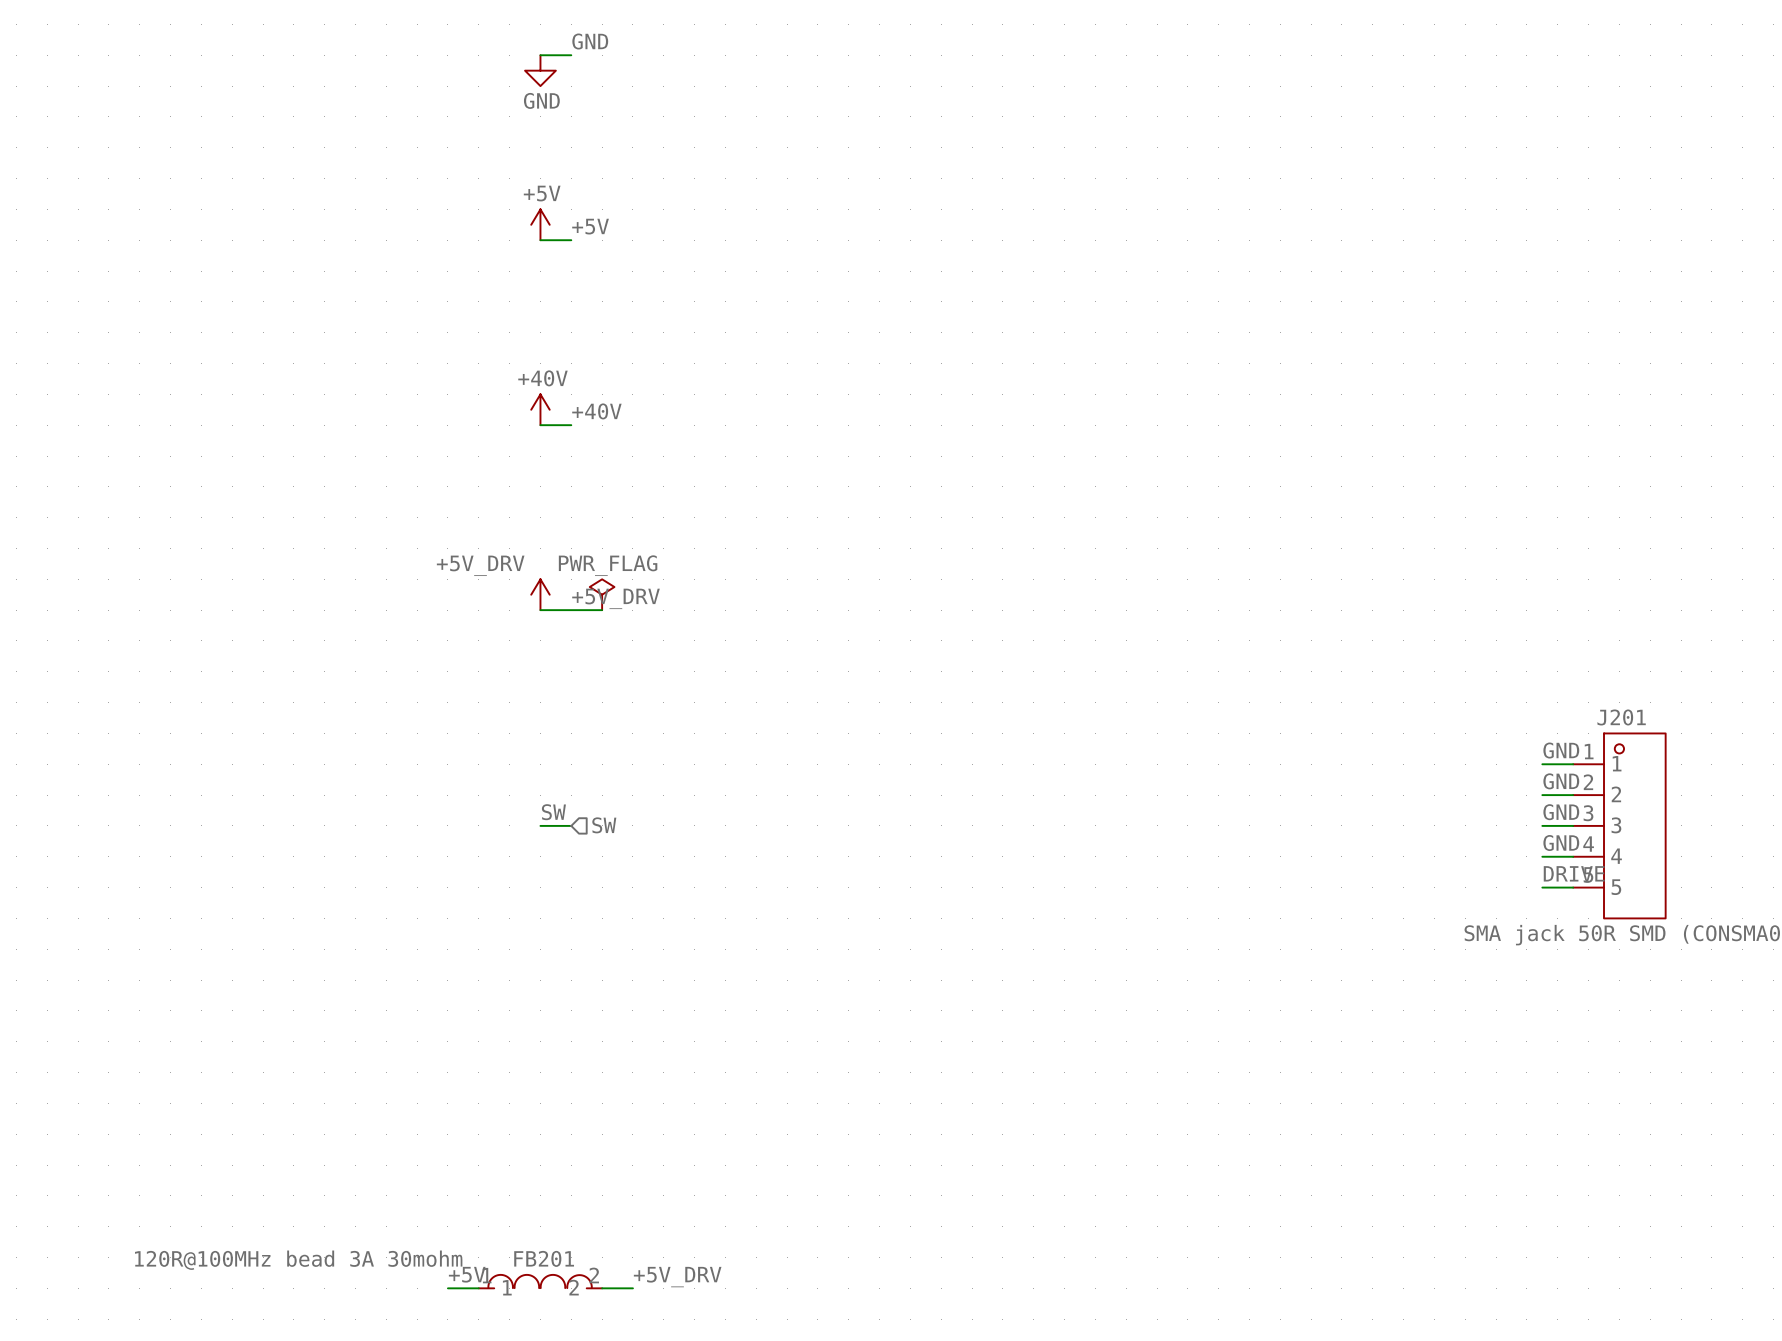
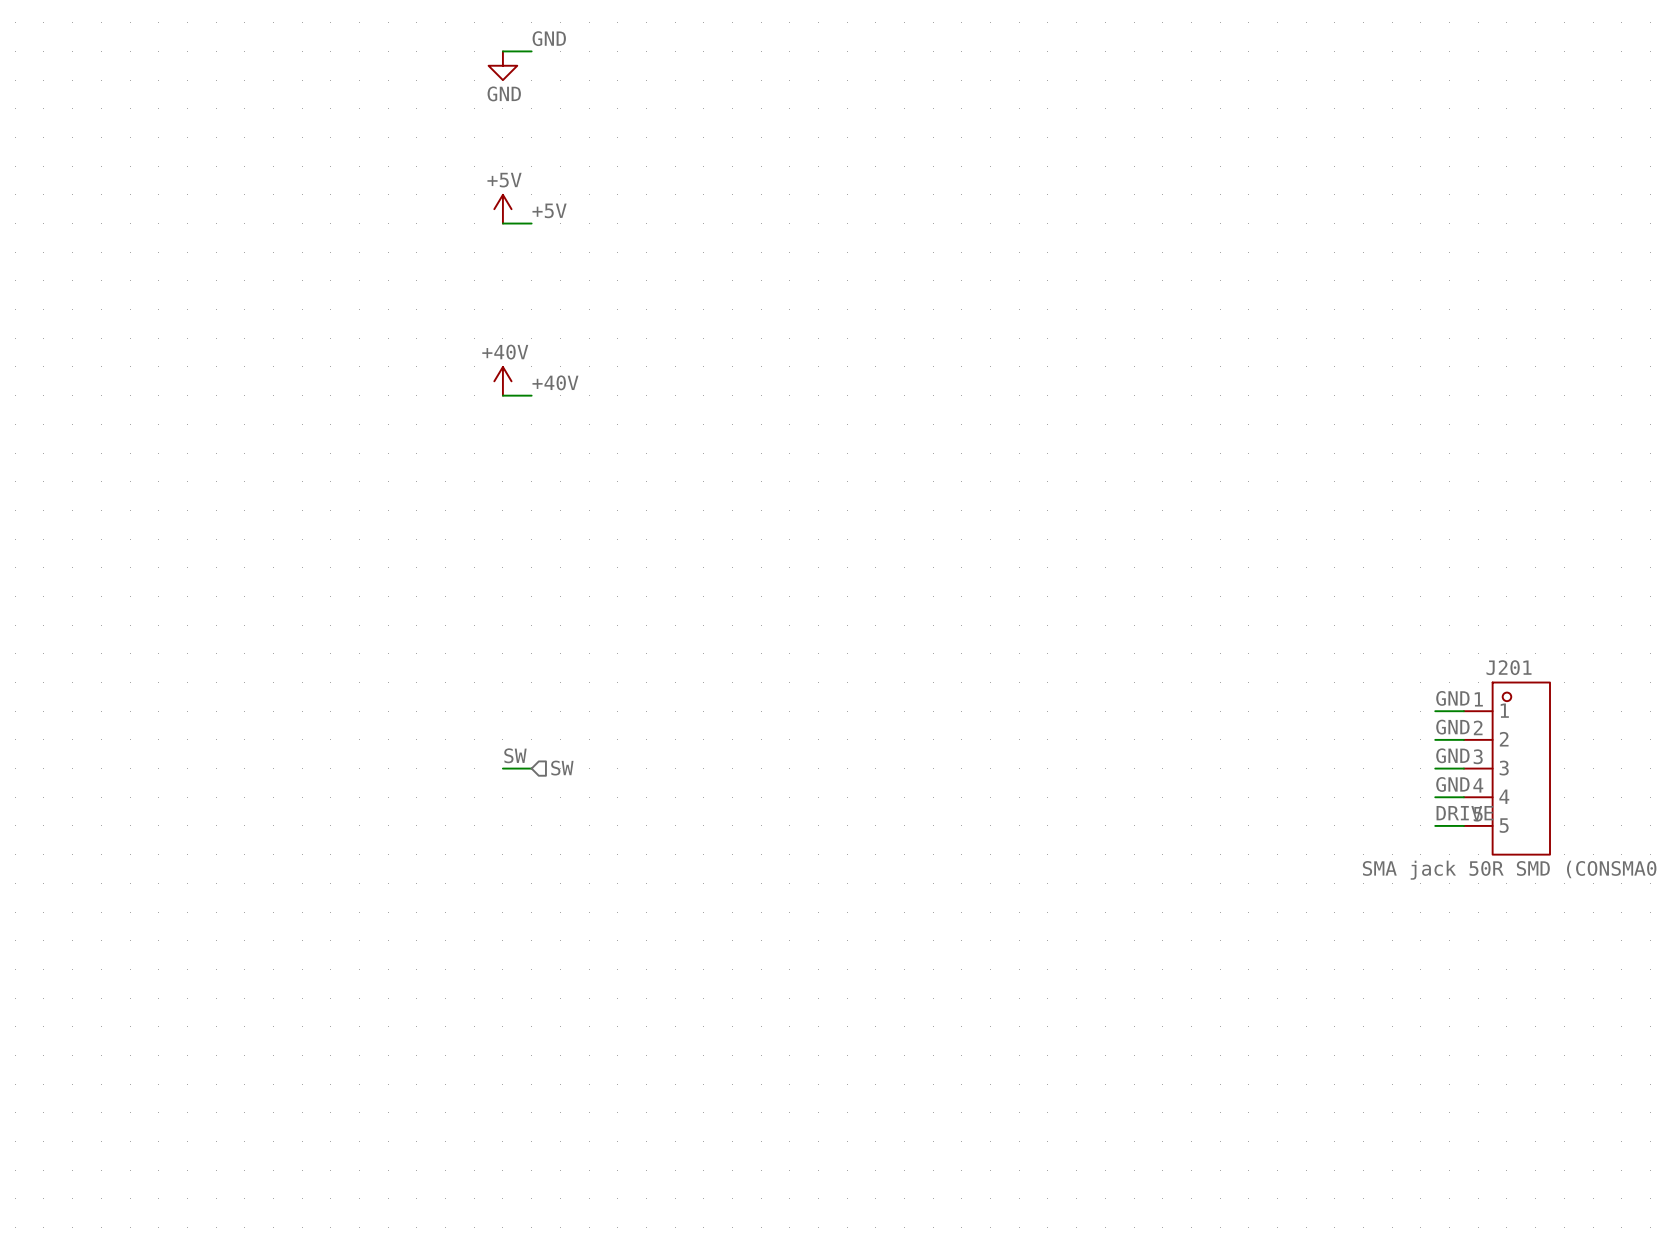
power symbol: +5V_DRV (540, 594) -> none
power symbol: PWR_FLAG (602, 594) -> none
label: +5V_DRV (616, 598) -> none
wire: (540, 610) (602, 610) -> none
label: +5V (467, 1274) -> none
label: +5V_DRV (677, 1277) -> none
FB201: 120R@100MHz bead 3A 30mohm (540, 1281) -> none
wire: (447, 1288) (478, 1288) -> none
wire: (602, 1288) (632, 1288) -> none

